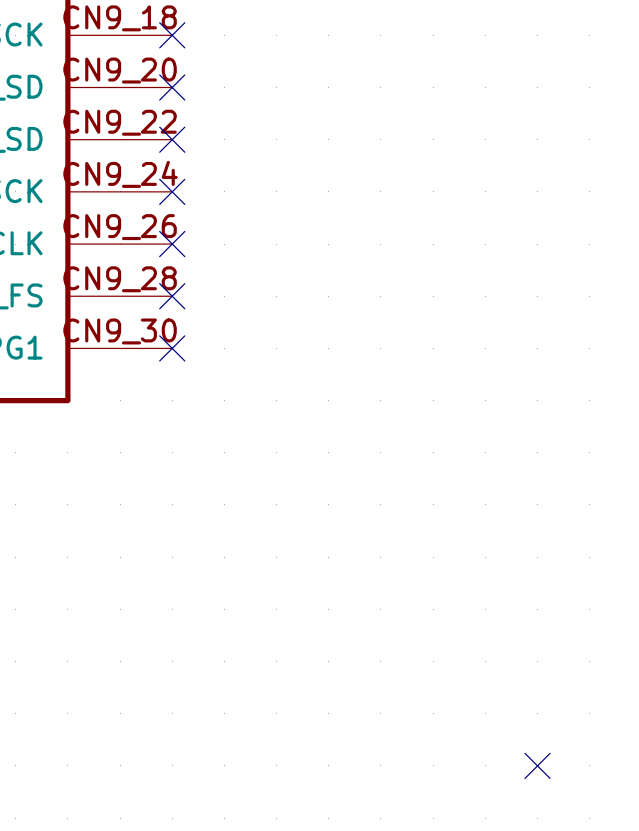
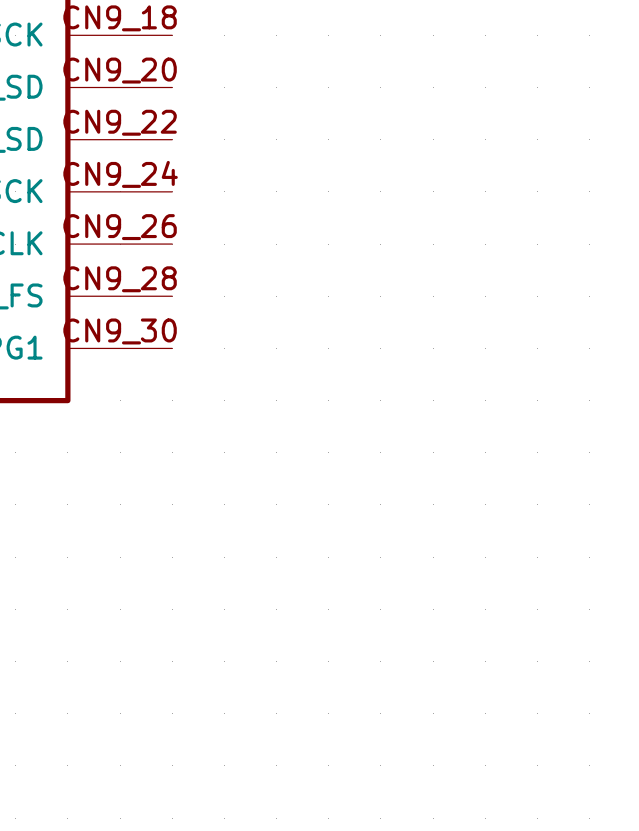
no-connect mark: (172, 35) -> none
no-connect mark: (172, 87) -> none
no-connect mark: (172, 139) -> none
no-connect mark: (172, 191) -> none
no-connect mark: (172, 244) -> none
no-connect mark: (172, 296) -> none
no-connect mark: (172, 348) -> none
no-connect mark: (537, 765) -> none

